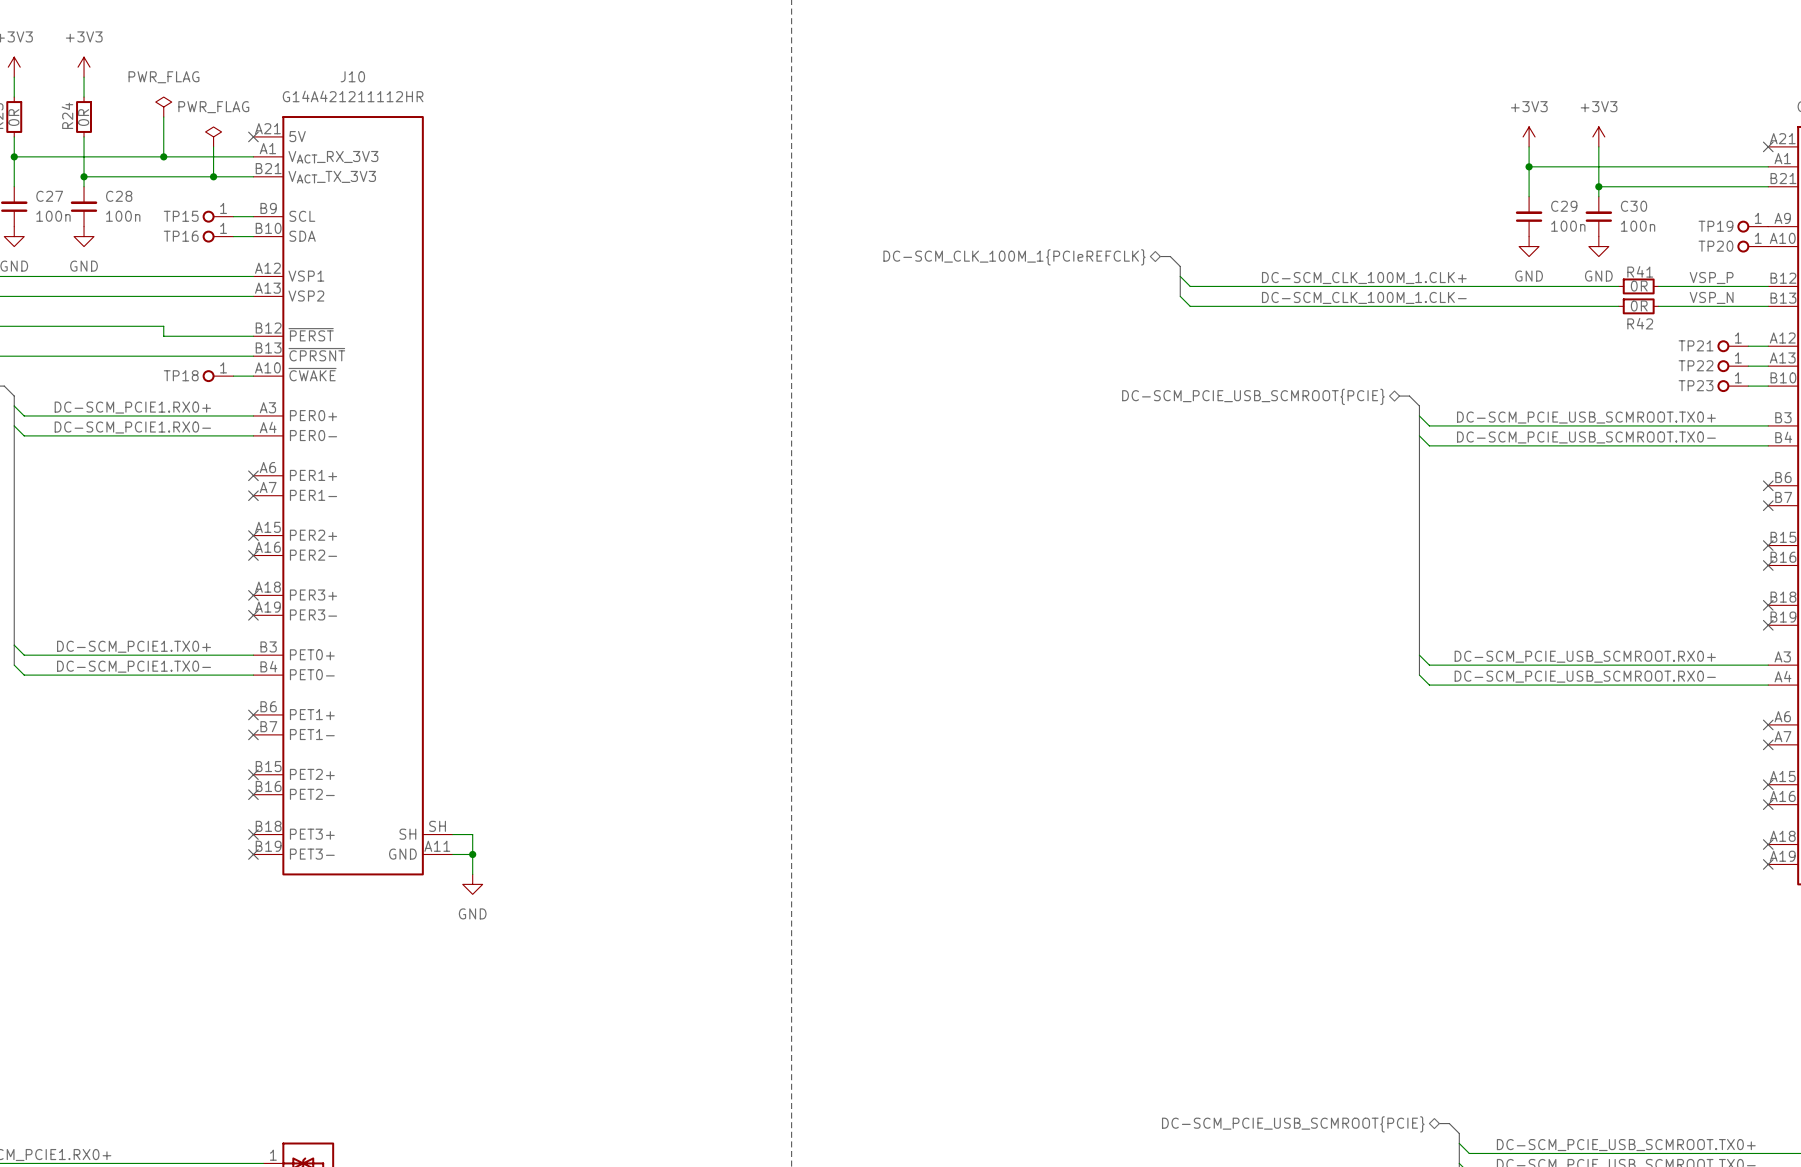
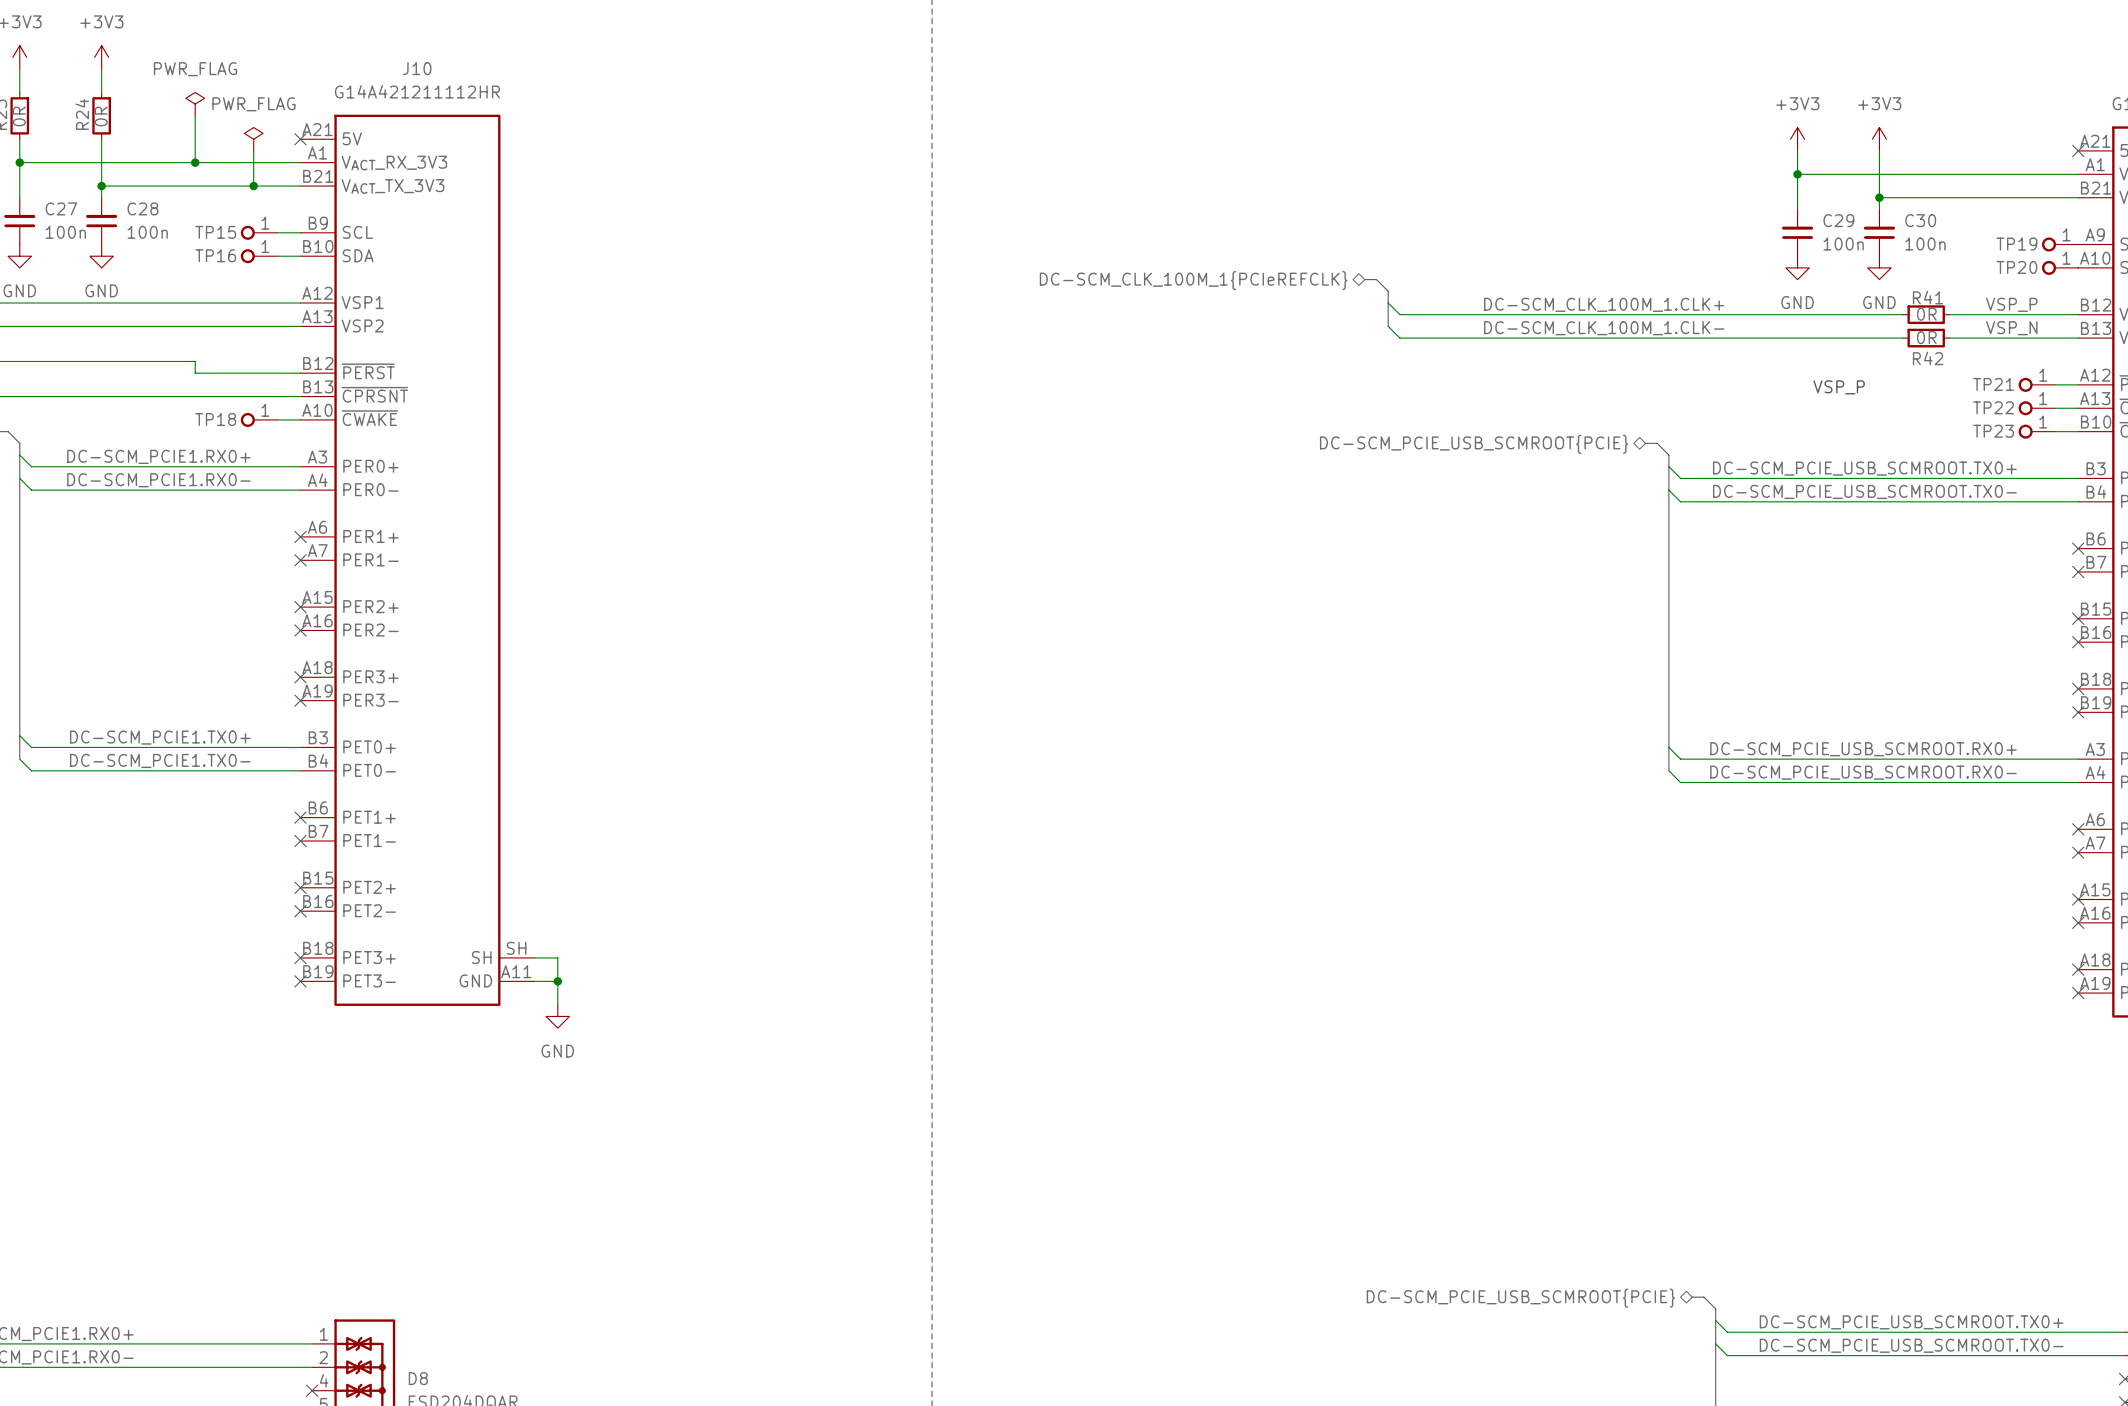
text: none -> VSP_P (1839, 387)

